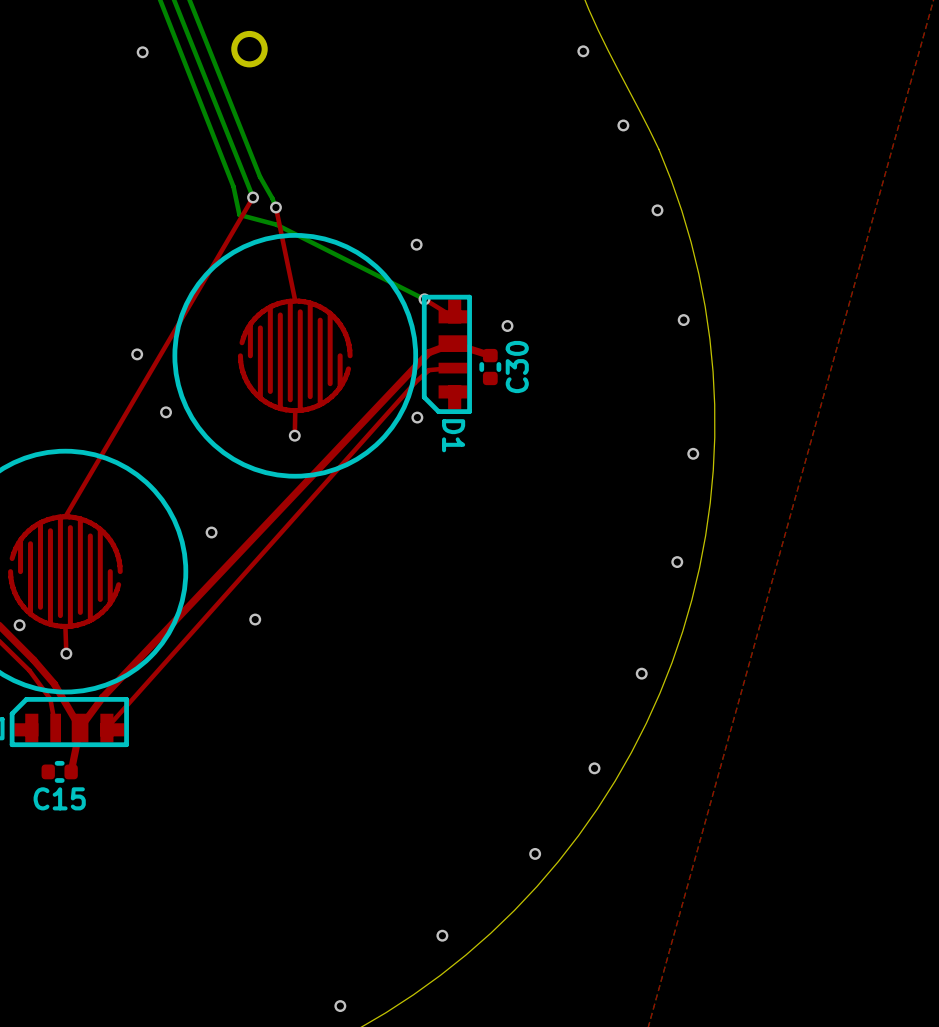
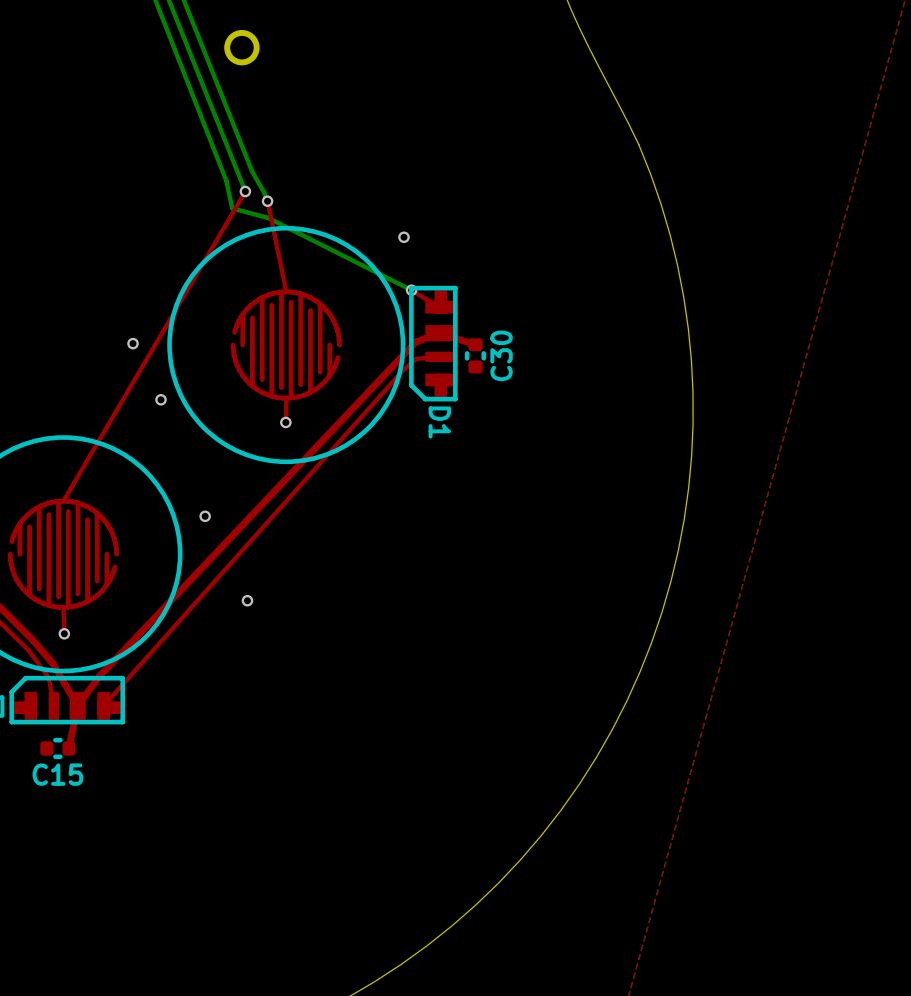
via: (583, 51) -> none
via: (142, 52) -> none
via: (623, 125) -> none
via: (657, 210) -> none
via: (683, 320) -> none
via: (507, 326) -> none
via: (417, 417) -> none
via: (693, 453) -> none
via: (677, 562) -> none
via: (19, 625) -> none
via: (641, 673) -> none
via: (594, 768) -> none
via: (535, 853) -> none
via: (442, 935) -> none
via: (340, 1006) -> none

